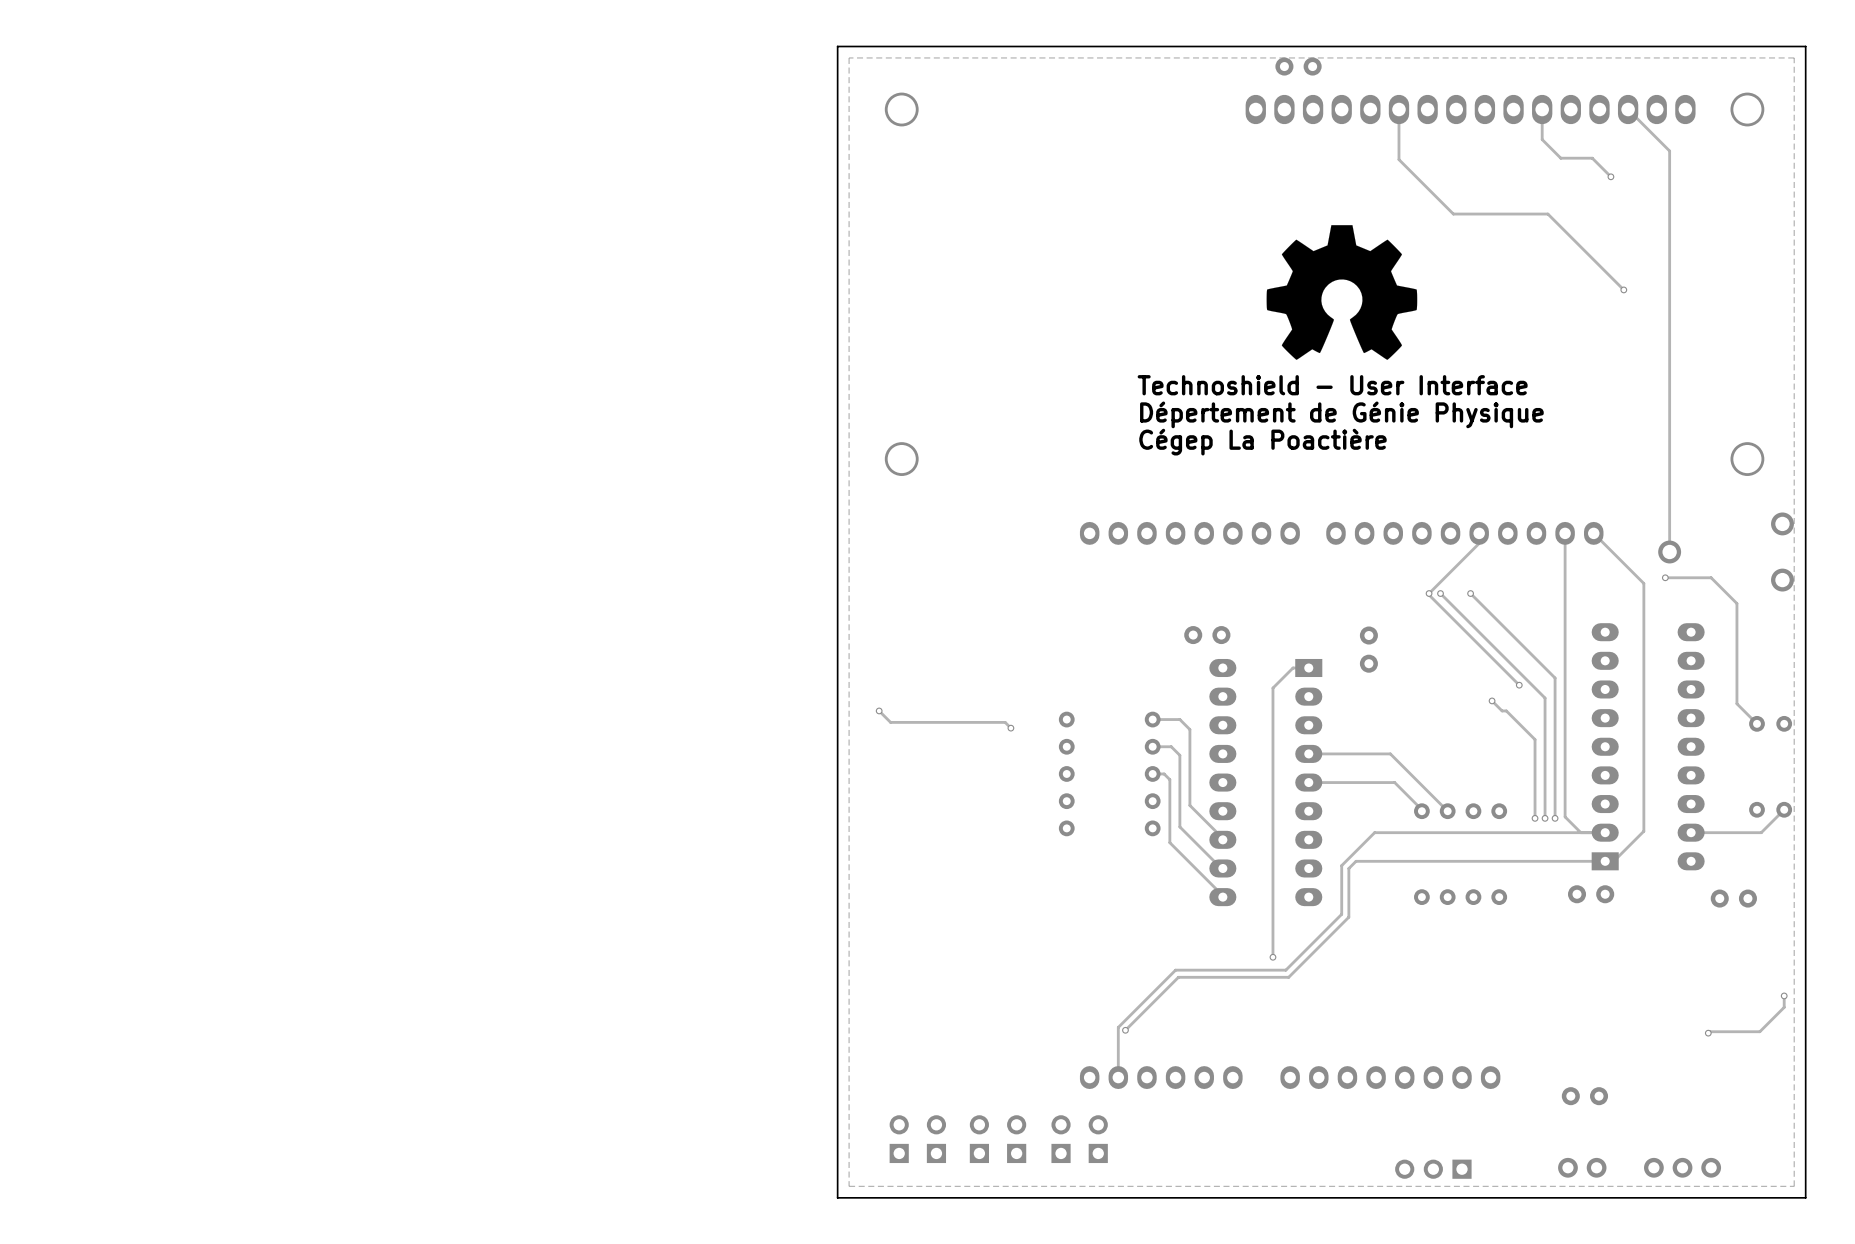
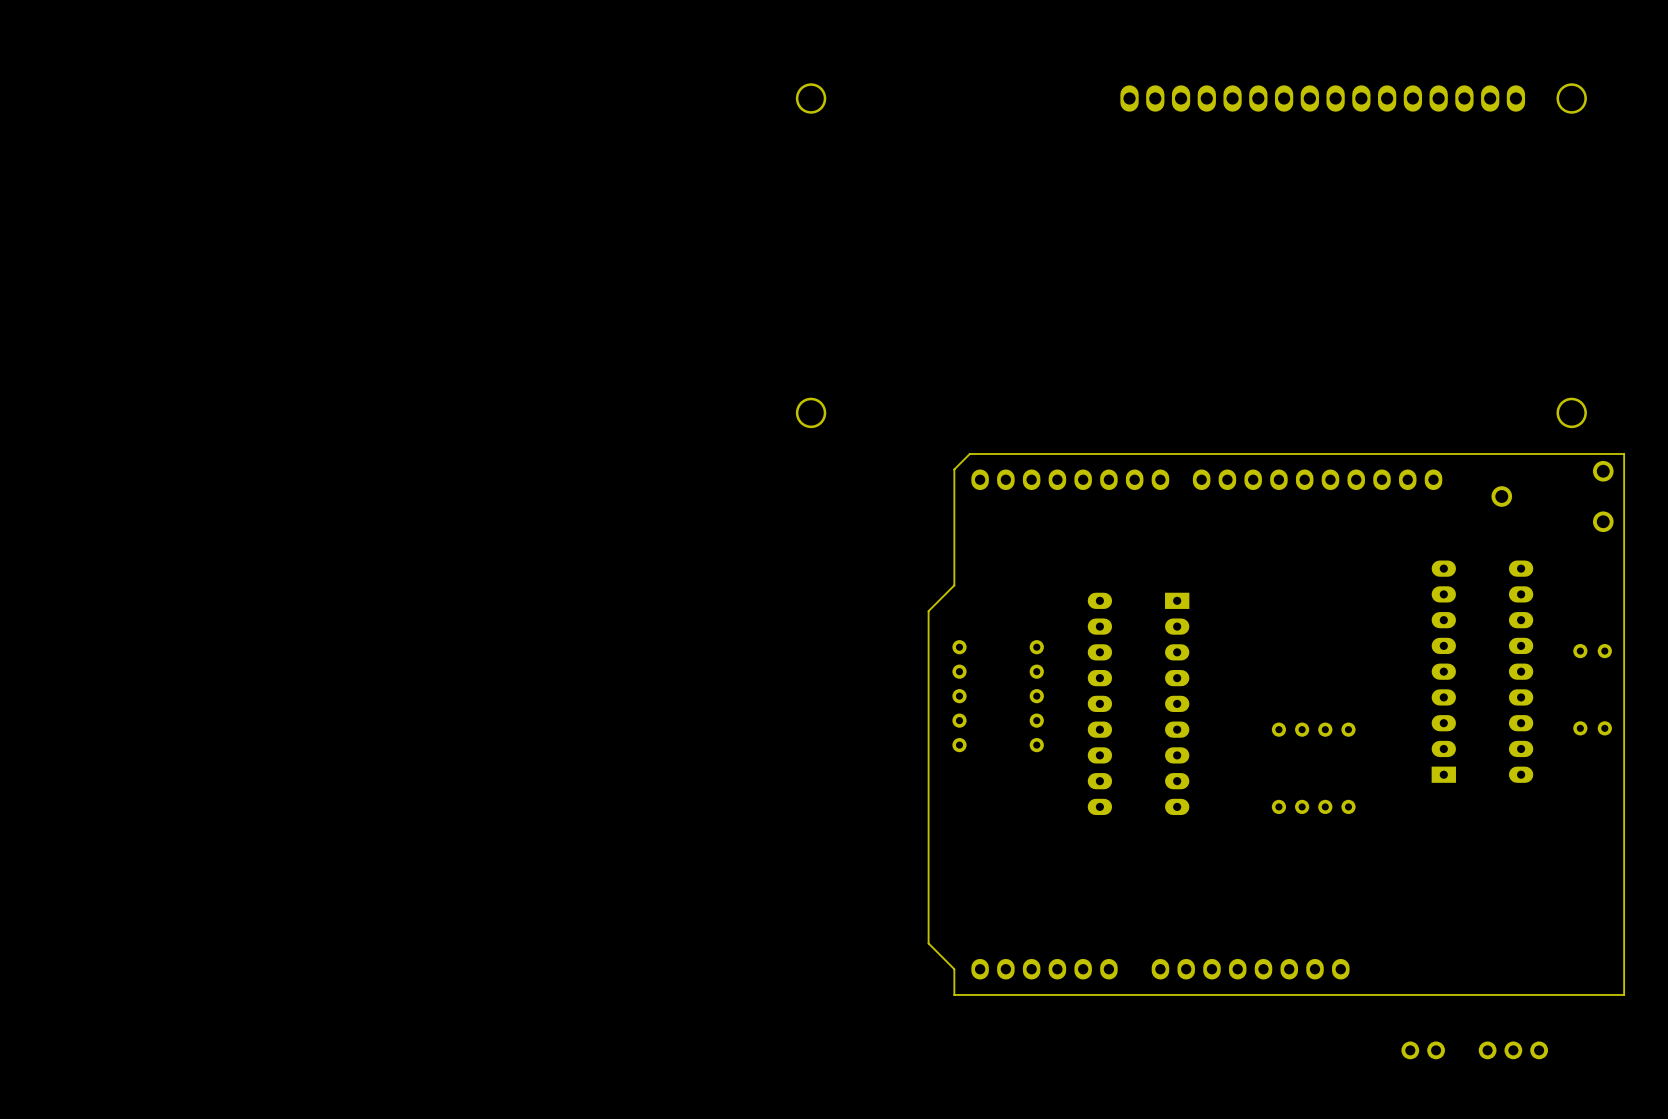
zone outline: (1794, 57) (1794, 1186) (849, 1186) (849, 57) (1794, 57) -> none
part: (1298, 66) -> none
track: (1398, 109) (1398, 159) (1453, 214) (1547, 214) (1623, 289) -> none
track: (1542, 109) (1542, 139) (1560, 158) (1592, 158) (1610, 176) -> none
track: (1628, 109) (1669, 151) (1669, 552) -> none
via: (1610, 176) -> none
drawing: [1266, 225, 1418, 360] -> none
via: (1623, 289) -> none
text: Technoshield - User Interface (1332, 385) -> none
text: Dépertement de Génie Physique (1341, 414) -> none
text: Cégep La Poactière (1262, 442) -> none
board edge: (1805, 504) (1805, 46) (837, 46) (837, 1197) (1805, 1197) (1805, 1106) -> (1624, 454) (969, 454) (954, 469) (954, 585) (928, 611) (928, 943) (954, 969) (954, 994) (1624, 994)
track: (1479, 533) (1479, 543) (1429, 594) (1519, 685) -> none
track: (1565, 533) (1565, 816) (1580, 832) -> none
track: (1593, 533) (1643, 583) (1643, 831) (1613, 861) (1356, 861) (1348, 868) (1348, 917) (1288, 977) (1178, 977) (1125, 1030) -> none
track: (1665, 577) (1711, 577) (1736, 603) (1736, 703) (1756, 723) -> none
via: (1665, 577) -> none
via: (1429, 593) -> none
track: (1440, 593) (1545, 698) (1545, 818) -> none
via: (1440, 593) -> none
track: (1470, 593) (1555, 678) (1555, 818) -> none
via: (1470, 593) -> none
part: (1207, 635) -> none
part: (1368, 649) -> none
track: (1308, 667) (1293, 667) (1272, 688) (1272, 957) -> none
via: (1519, 685) -> none
track: (1492, 700) (1502, 710) (1506, 710) (1535, 739) (1535, 818) -> none
via: (1492, 700) -> none
track: (879, 710) (890, 722) (1005, 722) (1010, 728) -> none
via: (879, 710) -> none
track: (1152, 719) (1179, 719) (1189, 729) (1189, 805) (1222, 839) -> none
via: (1010, 728) -> none
track: (1152, 746) (1171, 746) (1179, 755) (1179, 826) (1222, 868) -> none
track: (1308, 753) (1390, 753) (1447, 811) -> none
track: (1152, 773) (1164, 773) (1169, 779) (1169, 842) (1222, 897) -> none
track: (1308, 782) (1394, 782) (1421, 811) -> none
track: (1784, 809) (1761, 832) (1691, 832) -> none
via: (1535, 818) -> none
via: (1545, 818) -> none
via: (1555, 818) -> none
track: (1605, 832) (1374, 832) (1341, 865) (1341, 914) (1285, 970) (1175, 970) (1118, 1027) (1118, 1077) -> none
part: (1591, 894) -> none
part: (1733, 898) -> none
via: (1272, 957) -> none
track: (1784, 995) (1784, 1007) (1759, 1031) (1708, 1033) -> none
via: (1784, 995) -> none
via: (1125, 1030) -> none
via: (1708, 1033) -> none
part: (1584, 1096) -> none
part: (899, 1139) -> none
part: (936, 1139) -> none
part: (979, 1139) -> none
part: (1016, 1139) -> none
part: (1061, 1139) -> none
part: (1098, 1139) -> none
part: (1433, 1169) -> none

